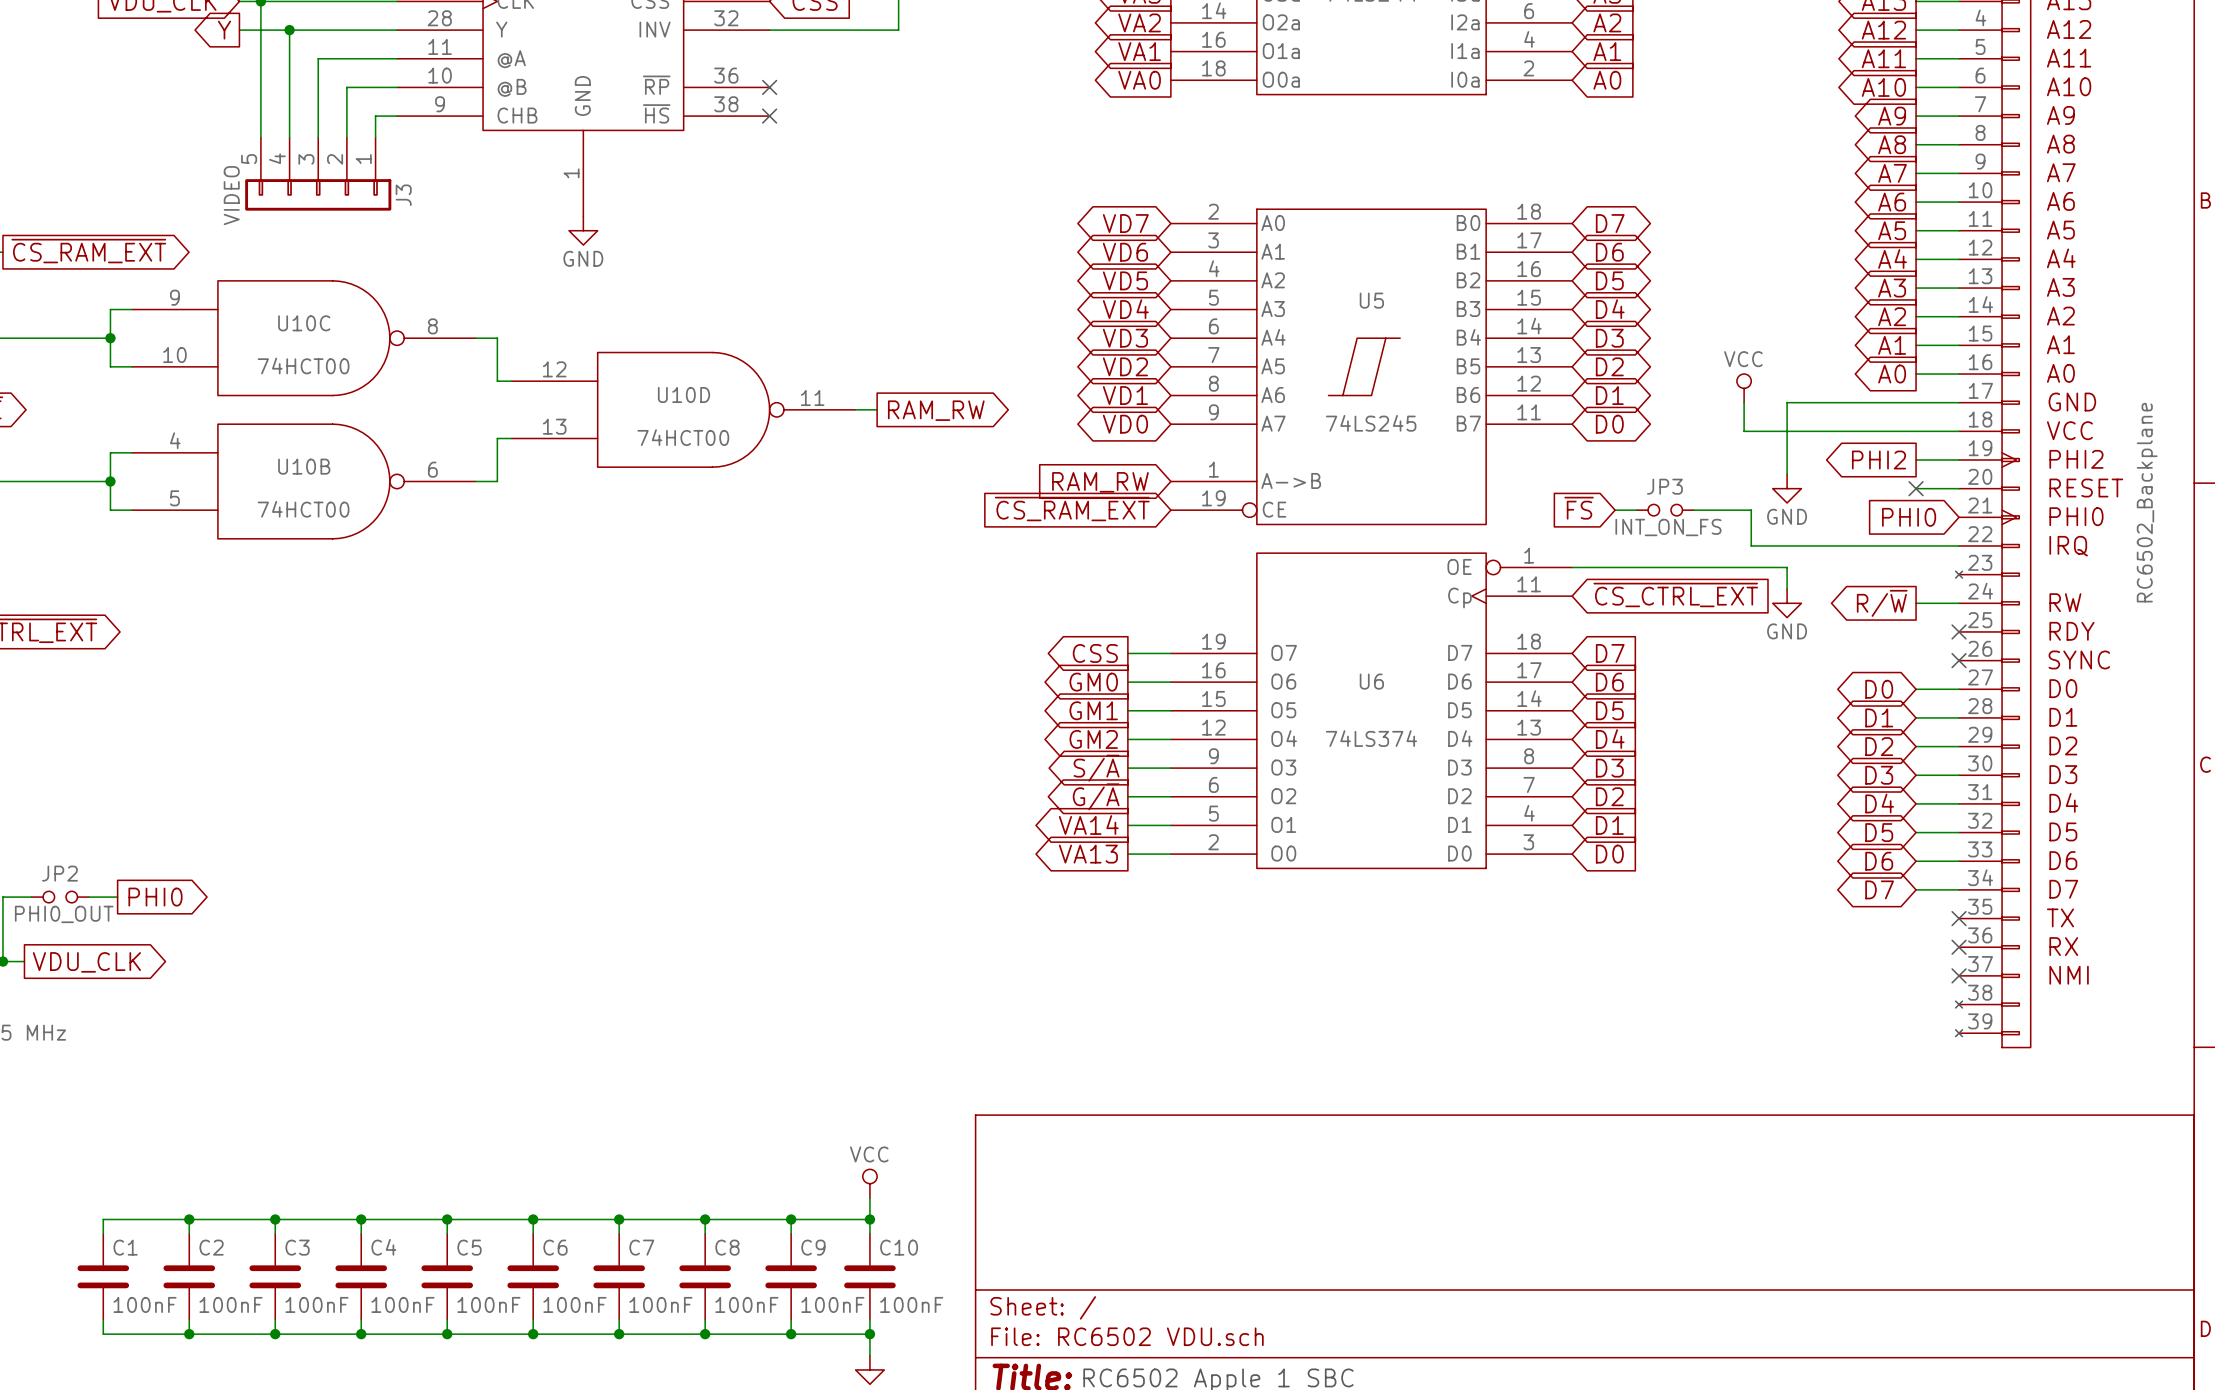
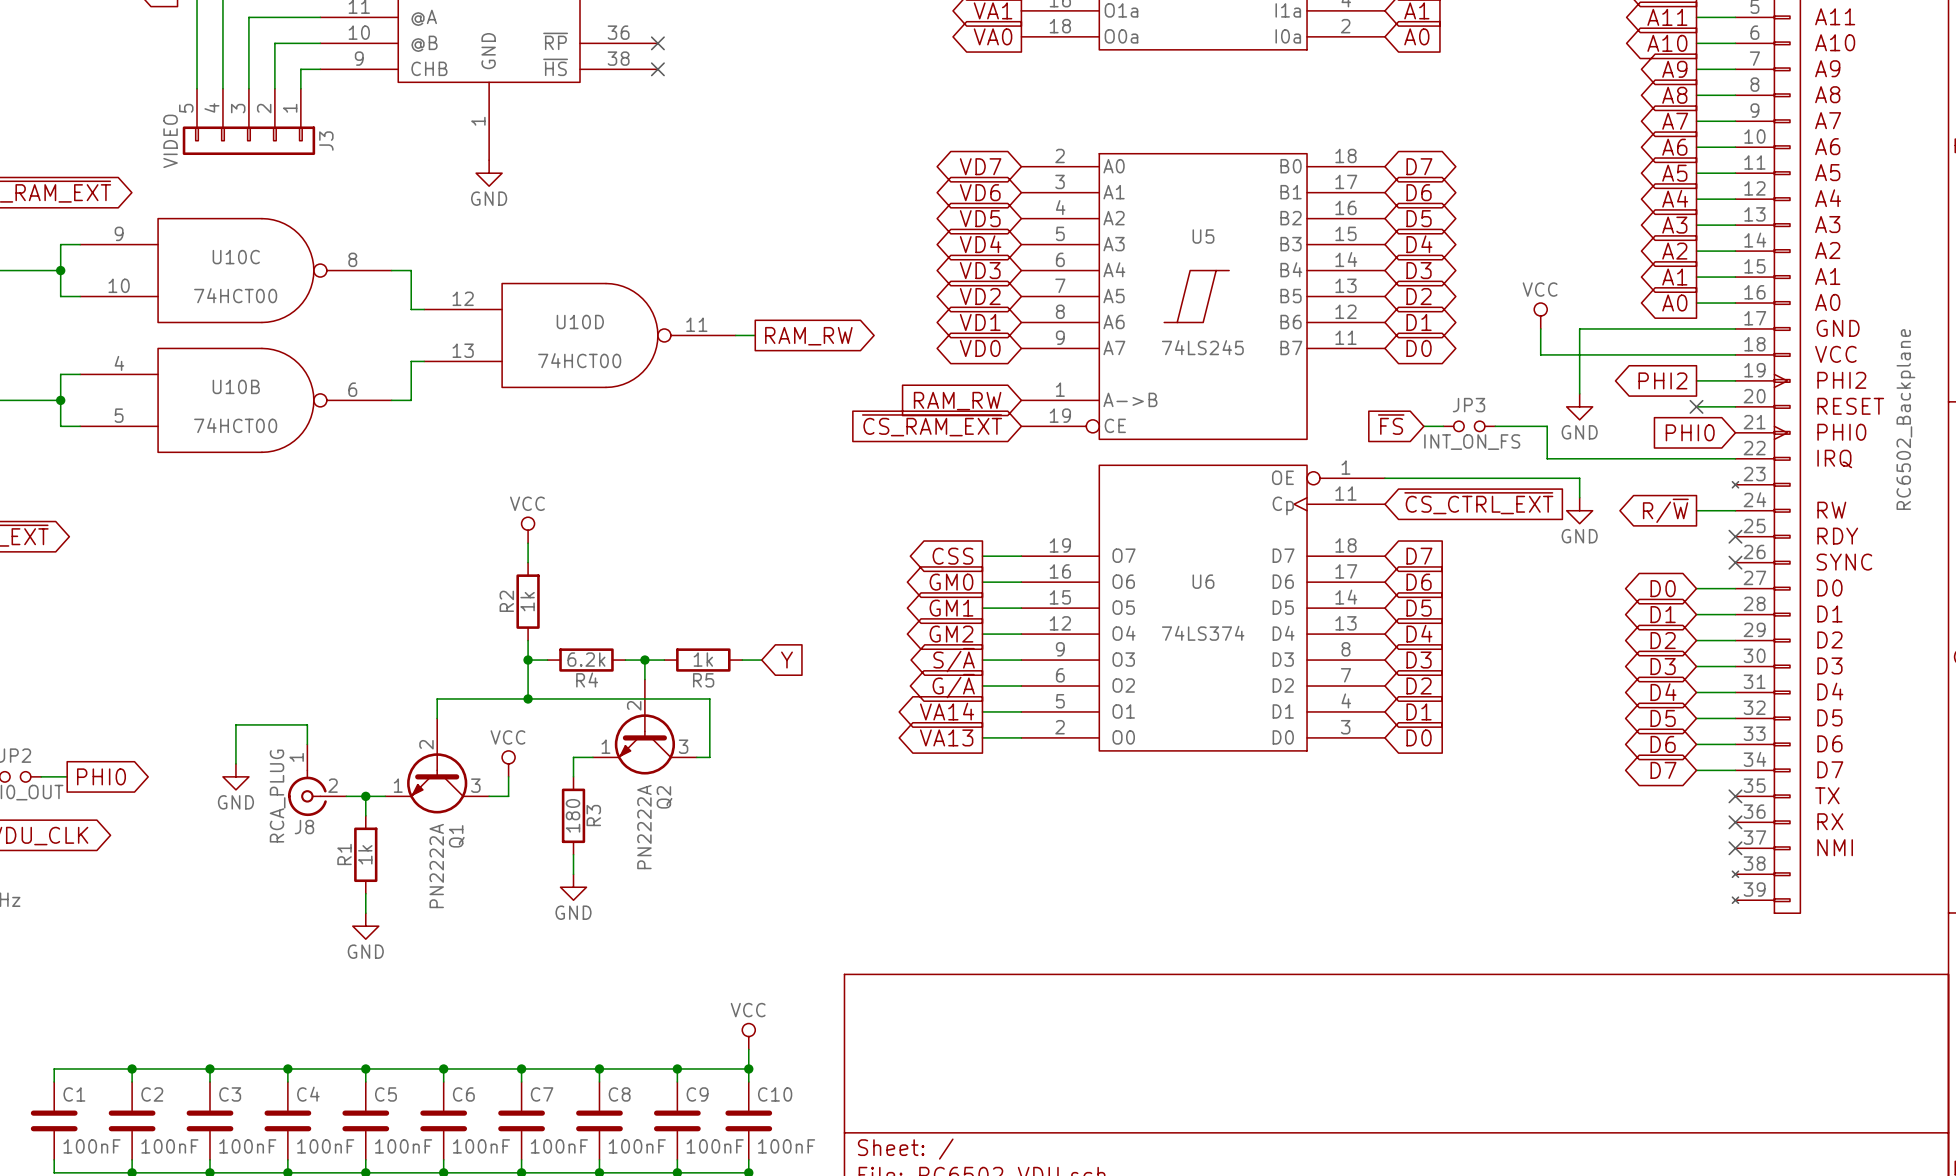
power symbol: none -> VCC (528, 530)
wire: none -> (528, 543) (528, 562)
R2: none -> 1k (528, 601)
wire: none -> (528, 640) (528, 698)
wire: none -> (528, 660) (547, 660)
junction: none -> (528, 660)
R4: none -> 6.2k (586, 660)
wire: none -> (625, 660) (664, 660)
wire: none -> (644, 660) (644, 679)
junction: none -> (644, 660)
R5: none -> 1k (703, 660)
wire: none -> (742, 660) (761, 660)
global label: none -> Y (786, 660)
junction: none -> (528, 698)
wire: none -> (437, 718) (437, 698) (709, 698) (709, 757) (696, 757)
Q2: none -> PN2222A (644, 727)
wire: none -> (307, 744) (307, 724) (235, 724) (235, 763)
wire: none -> (592, 757) (573, 757) (573, 776)
power symbol: none -> VCC (508, 763)
Q1: none -> PN2222A (437, 765)
power symbol: none -> GND (235, 776)
wire: none -> (508, 776) (508, 796) (489, 796)
J8: none -> RCA_PLUG (317, 780)
wire: none -> (346, 796) (385, 796)
wire: none -> (365, 796) (365, 815)
junction: none -> (365, 796)
R3: none -> 180 (573, 815)
R1: none -> 1k (365, 854)
wire: none -> (573, 854) (573, 874)
power symbol: none -> GND (573, 887)
wire: none -> (365, 893) (365, 913)
power symbol: none -> GND (365, 926)

